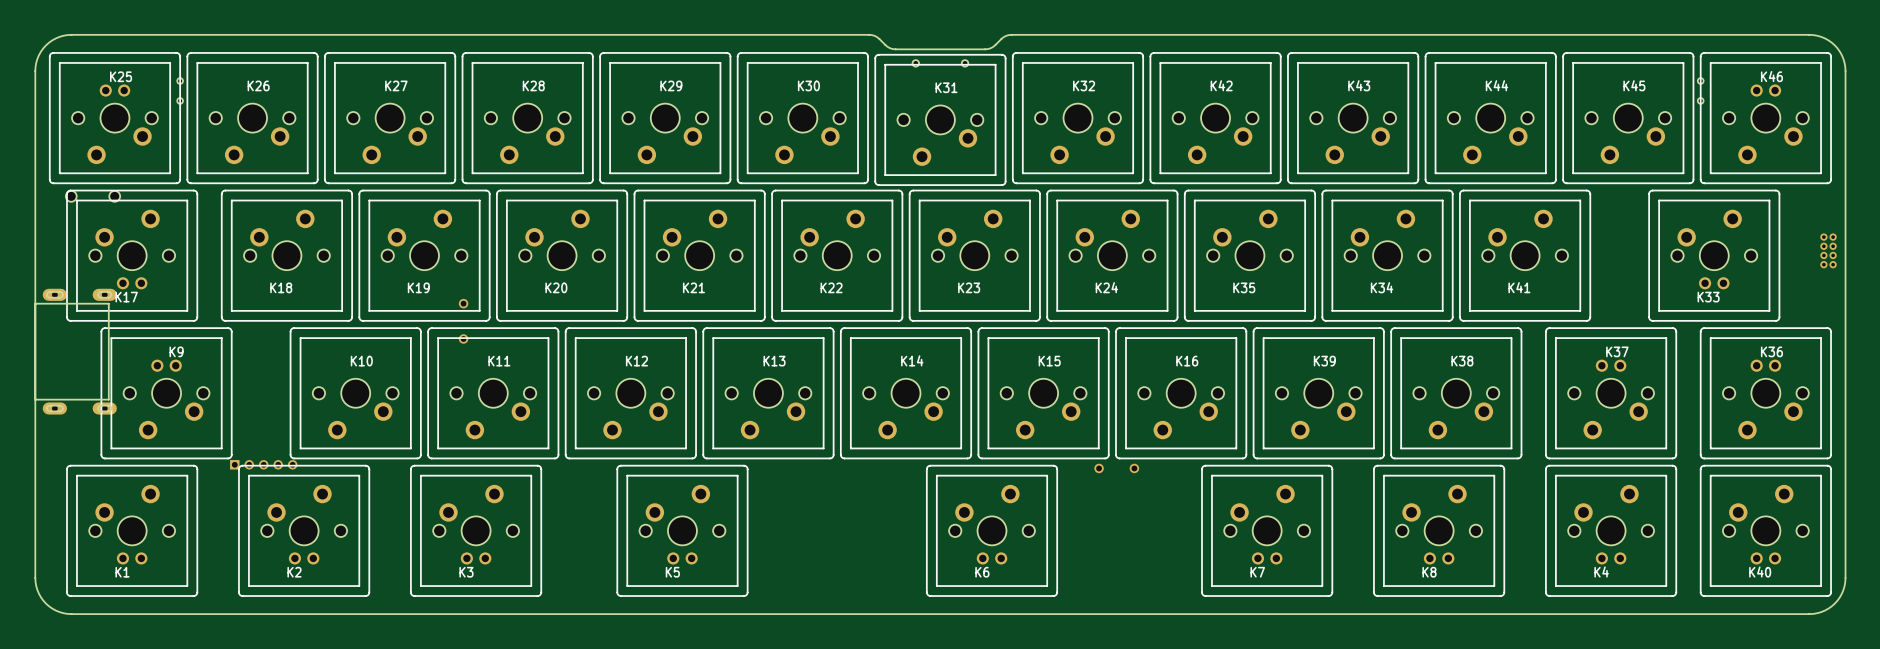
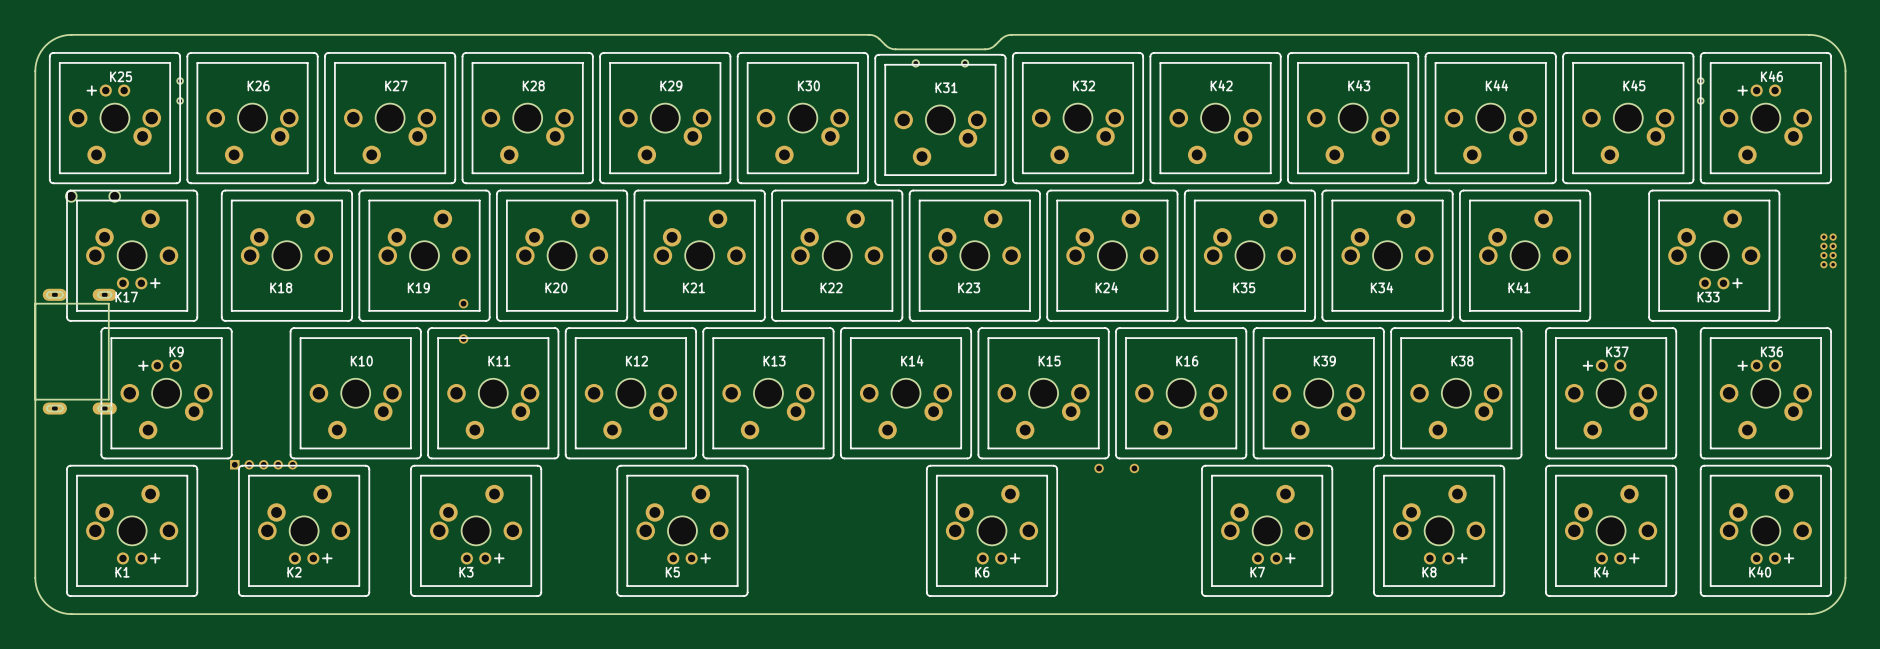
K25 footprint: [49, 52, 181, 184] -> [49, 52, 181, 184]
K26 footprint: [186, 52, 319, 184] -> [186, 52, 319, 184]
K27 footprint: [324, 52, 456, 184] -> [324, 52, 456, 184]
K28 footprint: [462, 52, 594, 184] -> [462, 52, 594, 184]
K29 footprint: [599, 52, 731, 184] -> [599, 52, 731, 184]
K30 footprint: [737, 52, 869, 184] -> [737, 52, 869, 184]
K32 footprint: [1012, 52, 1144, 184] -> [1012, 52, 1144, 184]
K42 footprint: [1149, 52, 1282, 184] -> [1149, 52, 1282, 184]
K43 footprint: [1287, 52, 1419, 184] -> [1287, 52, 1419, 184]
K44 footprint: [1425, 52, 1557, 184] -> [1425, 52, 1557, 184]
K45 footprint: [1562, 52, 1694, 184] -> [1562, 52, 1694, 184]
K46 footprint: [1700, 52, 1832, 184] -> [1700, 52, 1832, 184]
K31 footprint: [874, 54, 1007, 186] -> [874, 54, 1007, 186]
K17 footprint: [66, 190, 198, 322] -> [66, 190, 198, 322]
K18 footprint: [221, 190, 353, 322] -> [221, 190, 353, 322]
K19 footprint: [358, 190, 491, 322] -> [358, 190, 491, 322]
K20 footprint: [496, 190, 628, 322] -> [496, 190, 628, 322]
K21 footprint: [634, 190, 766, 322] -> [634, 190, 766, 322]
K22 footprint: [771, 190, 903, 322] -> [771, 190, 903, 322]
K23 footprint: [909, 190, 1041, 322] -> [909, 190, 1041, 322]
K24 footprint: [1046, 190, 1179, 322] -> [1046, 190, 1179, 322]
K35 footprint: [1184, 190, 1316, 322] -> [1184, 190, 1316, 322]
K34 footprint: [1321, 190, 1454, 322] -> [1321, 190, 1454, 322]
K41 footprint: [1459, 190, 1591, 322] -> [1459, 190, 1591, 322]
K33 footprint: [1648, 190, 1780, 322] -> [1648, 190, 1780, 322]
K9 footprint: [100, 327, 233, 459] -> [100, 327, 233, 459]
K10 footprint: [290, 327, 422, 459] -> [290, 327, 422, 459]
K11 footprint: [427, 327, 559, 459] -> [427, 327, 559, 459]
K12 footprint: [565, 327, 697, 459] -> [565, 327, 697, 459]
K13 footprint: [702, 327, 835, 459] -> [702, 327, 835, 459]
K14 footprint: [840, 327, 972, 459] -> [840, 327, 972, 459]
K15 footprint: [977, 327, 1110, 459] -> [977, 327, 1110, 459]
K16 footprint: [1115, 327, 1247, 459] -> [1115, 327, 1247, 459]
K39 footprint: [1253, 327, 1385, 459] -> [1253, 327, 1385, 459]
K38 footprint: [1390, 327, 1522, 459] -> [1390, 327, 1522, 459]
K37 footprint: [1545, 327, 1677, 459] -> [1545, 327, 1677, 459]
K36 footprint: [1700, 327, 1832, 459] -> [1700, 327, 1832, 459]
K1 footprint: [66, 465, 198, 597] -> [66, 465, 198, 597]
K2 footprint: [238, 465, 370, 597] -> [238, 465, 370, 597]
K3 footprint: [410, 465, 542, 597] -> [410, 465, 542, 597]
K5 footprint: [616, 465, 749, 597] -> [616, 465, 749, 597]
K6 footprint: [926, 465, 1058, 597] -> [926, 465, 1058, 597]
K7 footprint: [1201, 465, 1333, 597] -> [1201, 465, 1333, 597]
K8 footprint: [1373, 465, 1505, 597] -> [1373, 465, 1505, 597]
K4 footprint: [1545, 465, 1677, 597] -> [1545, 465, 1677, 597]
K40 footprint: [1700, 465, 1832, 597] -> [1700, 465, 1832, 597]

